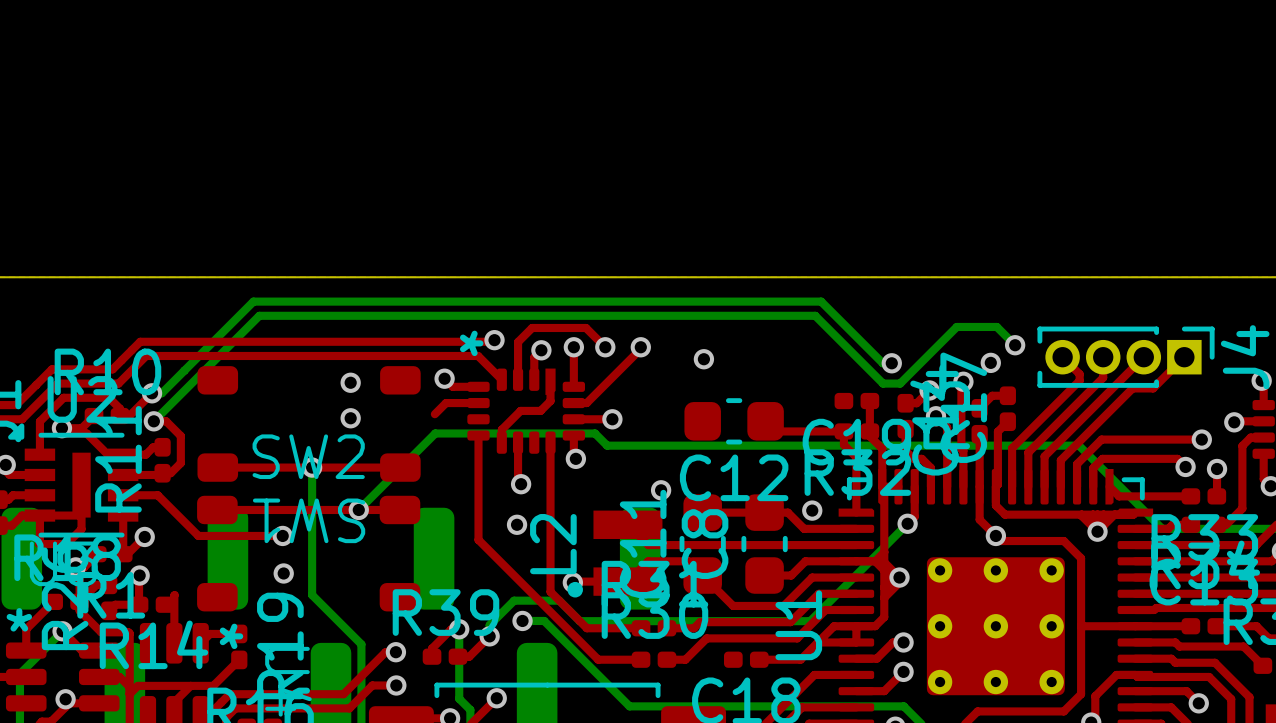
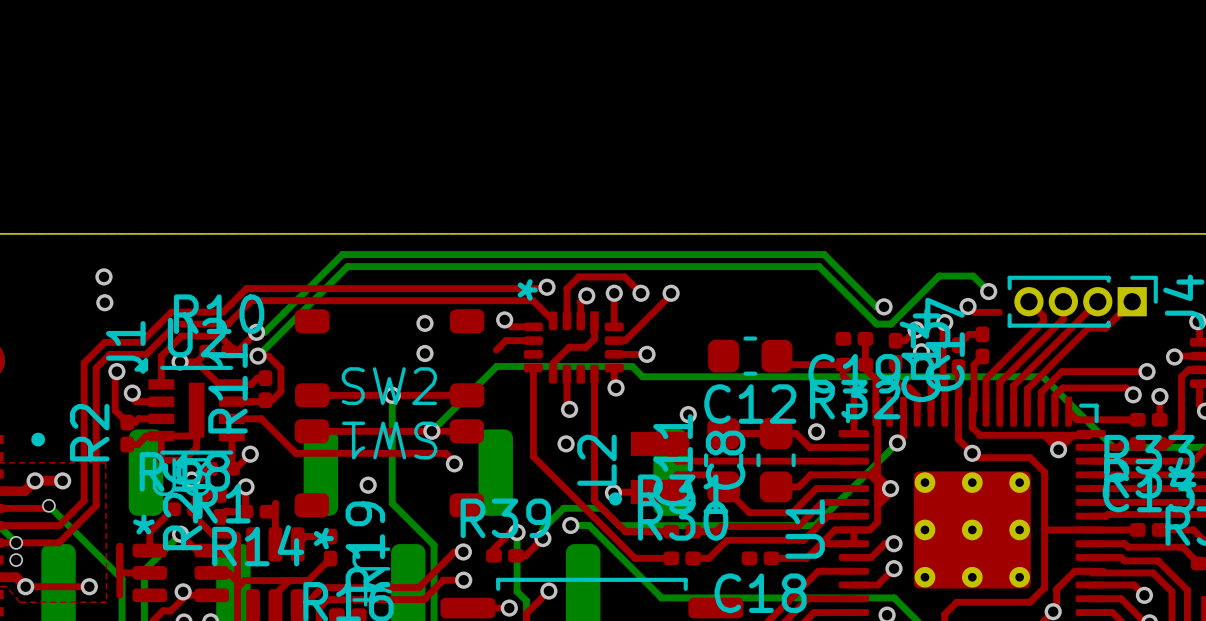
via: (703, 359) -> none
top track: none -> (973, 312) (999, 312)
top track: none -> (367, 453) (445, 453) (454, 463)
via position: (282, 535) -> (454, 463)

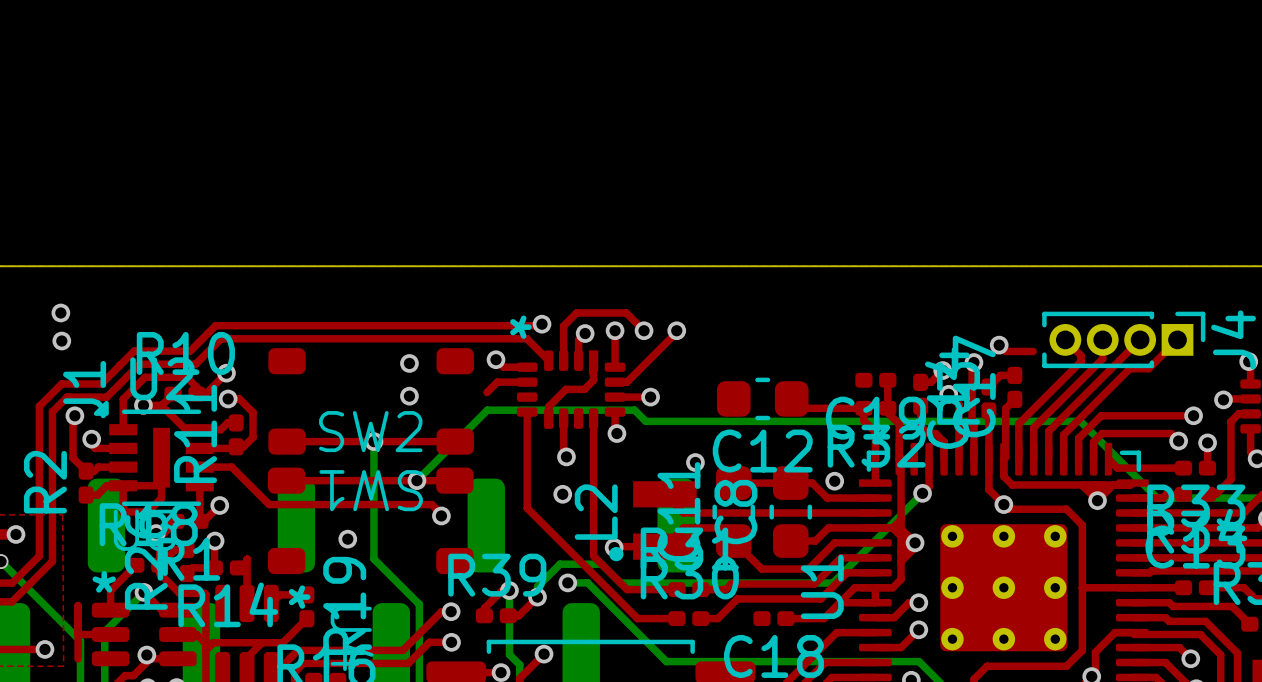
bottom track: (988, 291) (973, 276) (939, 276) (891, 324) (876, 324) (819, 266) (347, 266) (258, 356) -> none
via: (988, 291) -> none
bottom track: (884, 306) (876, 306) (824, 254) (342, 254) (264, 332) (256, 332) -> none
via: (884, 306) -> none

